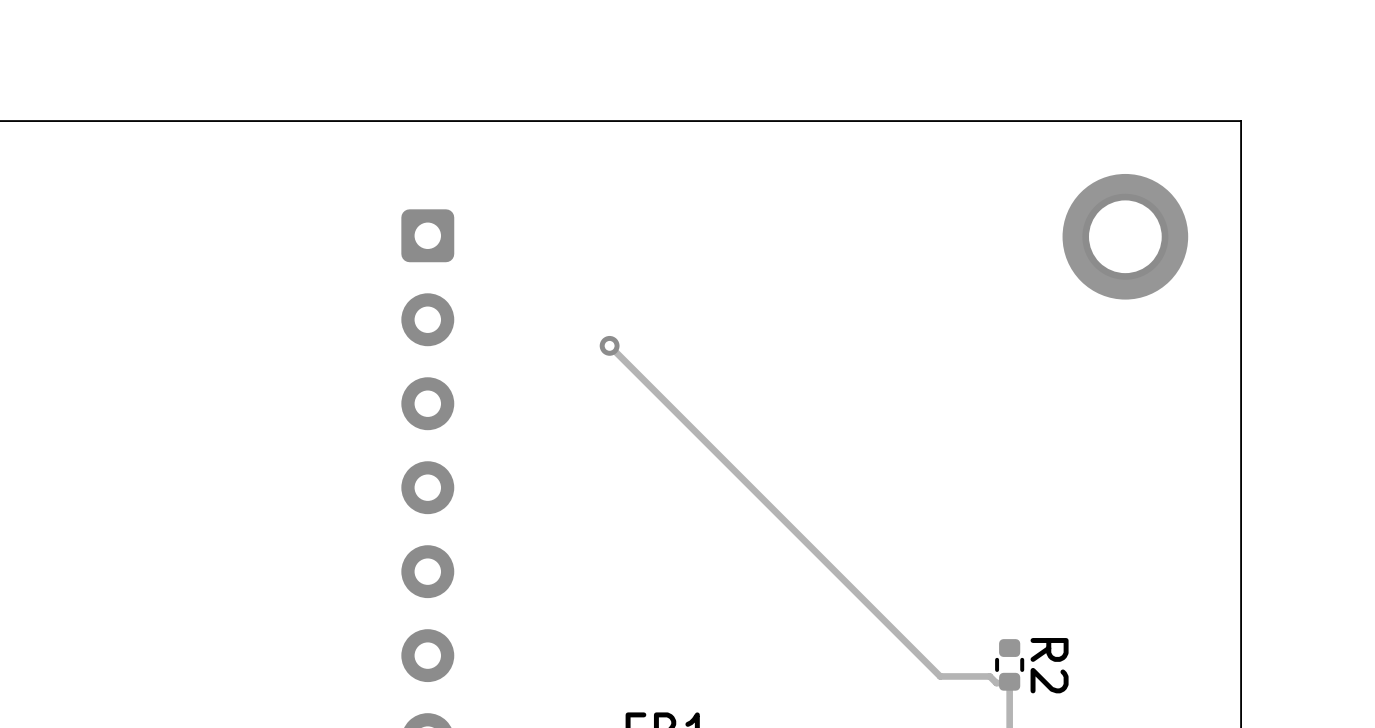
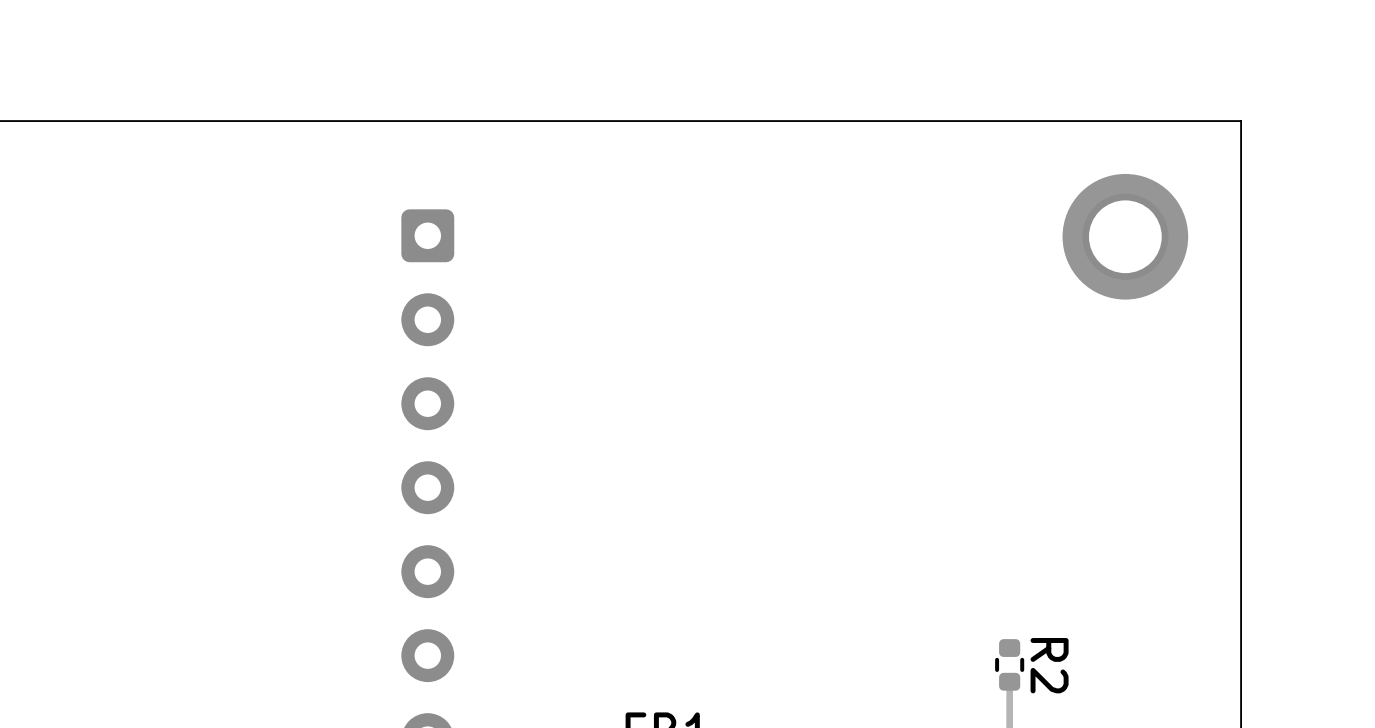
track: (609, 345) (940, 676) (989, 676) (996, 683) (1009, 681) -> none
via: (609, 345) -> none

